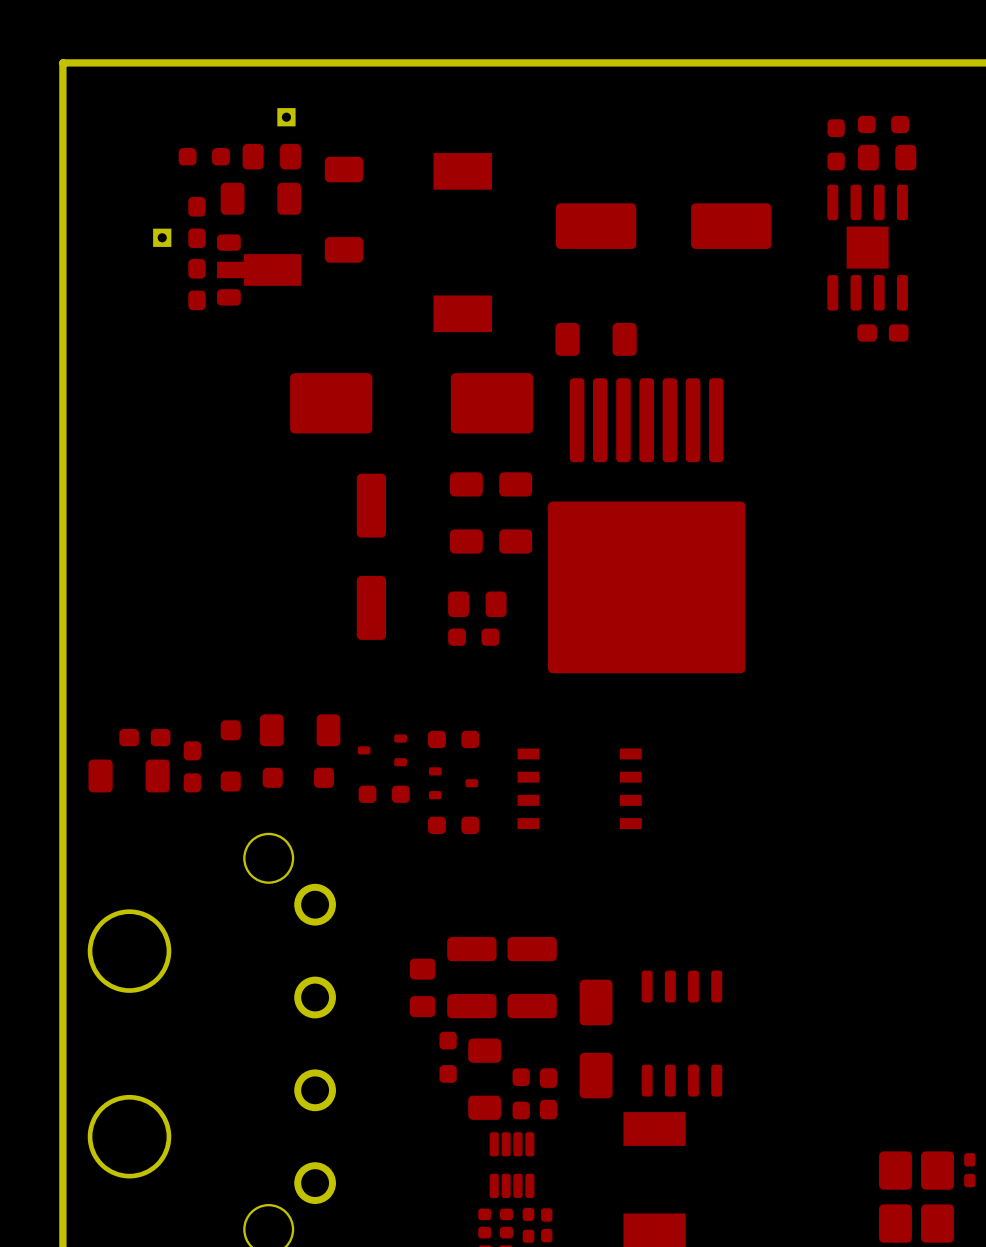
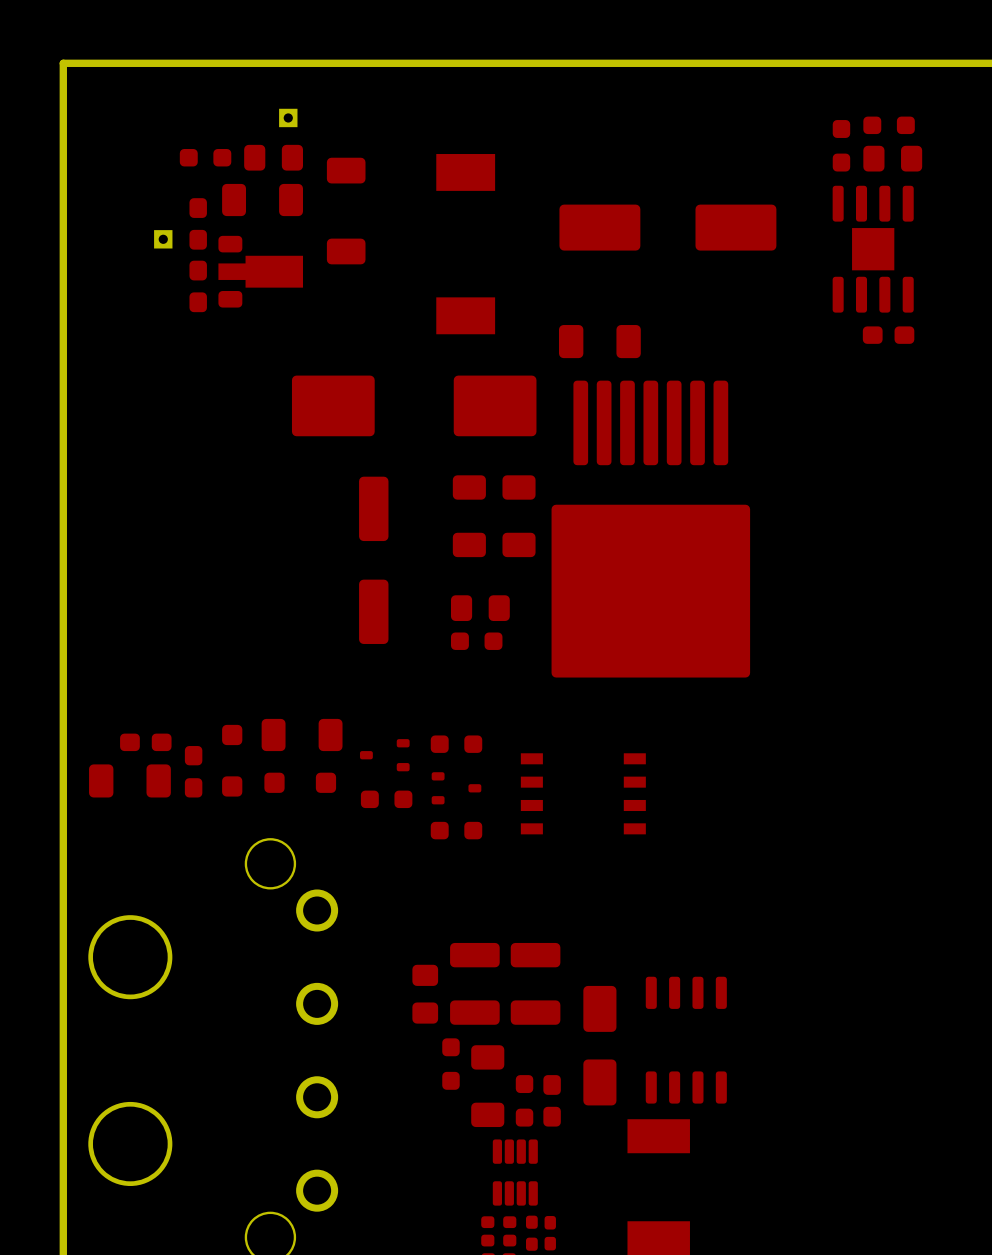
part: (969, 1170) -> none
part: (916, 1197) -> none

